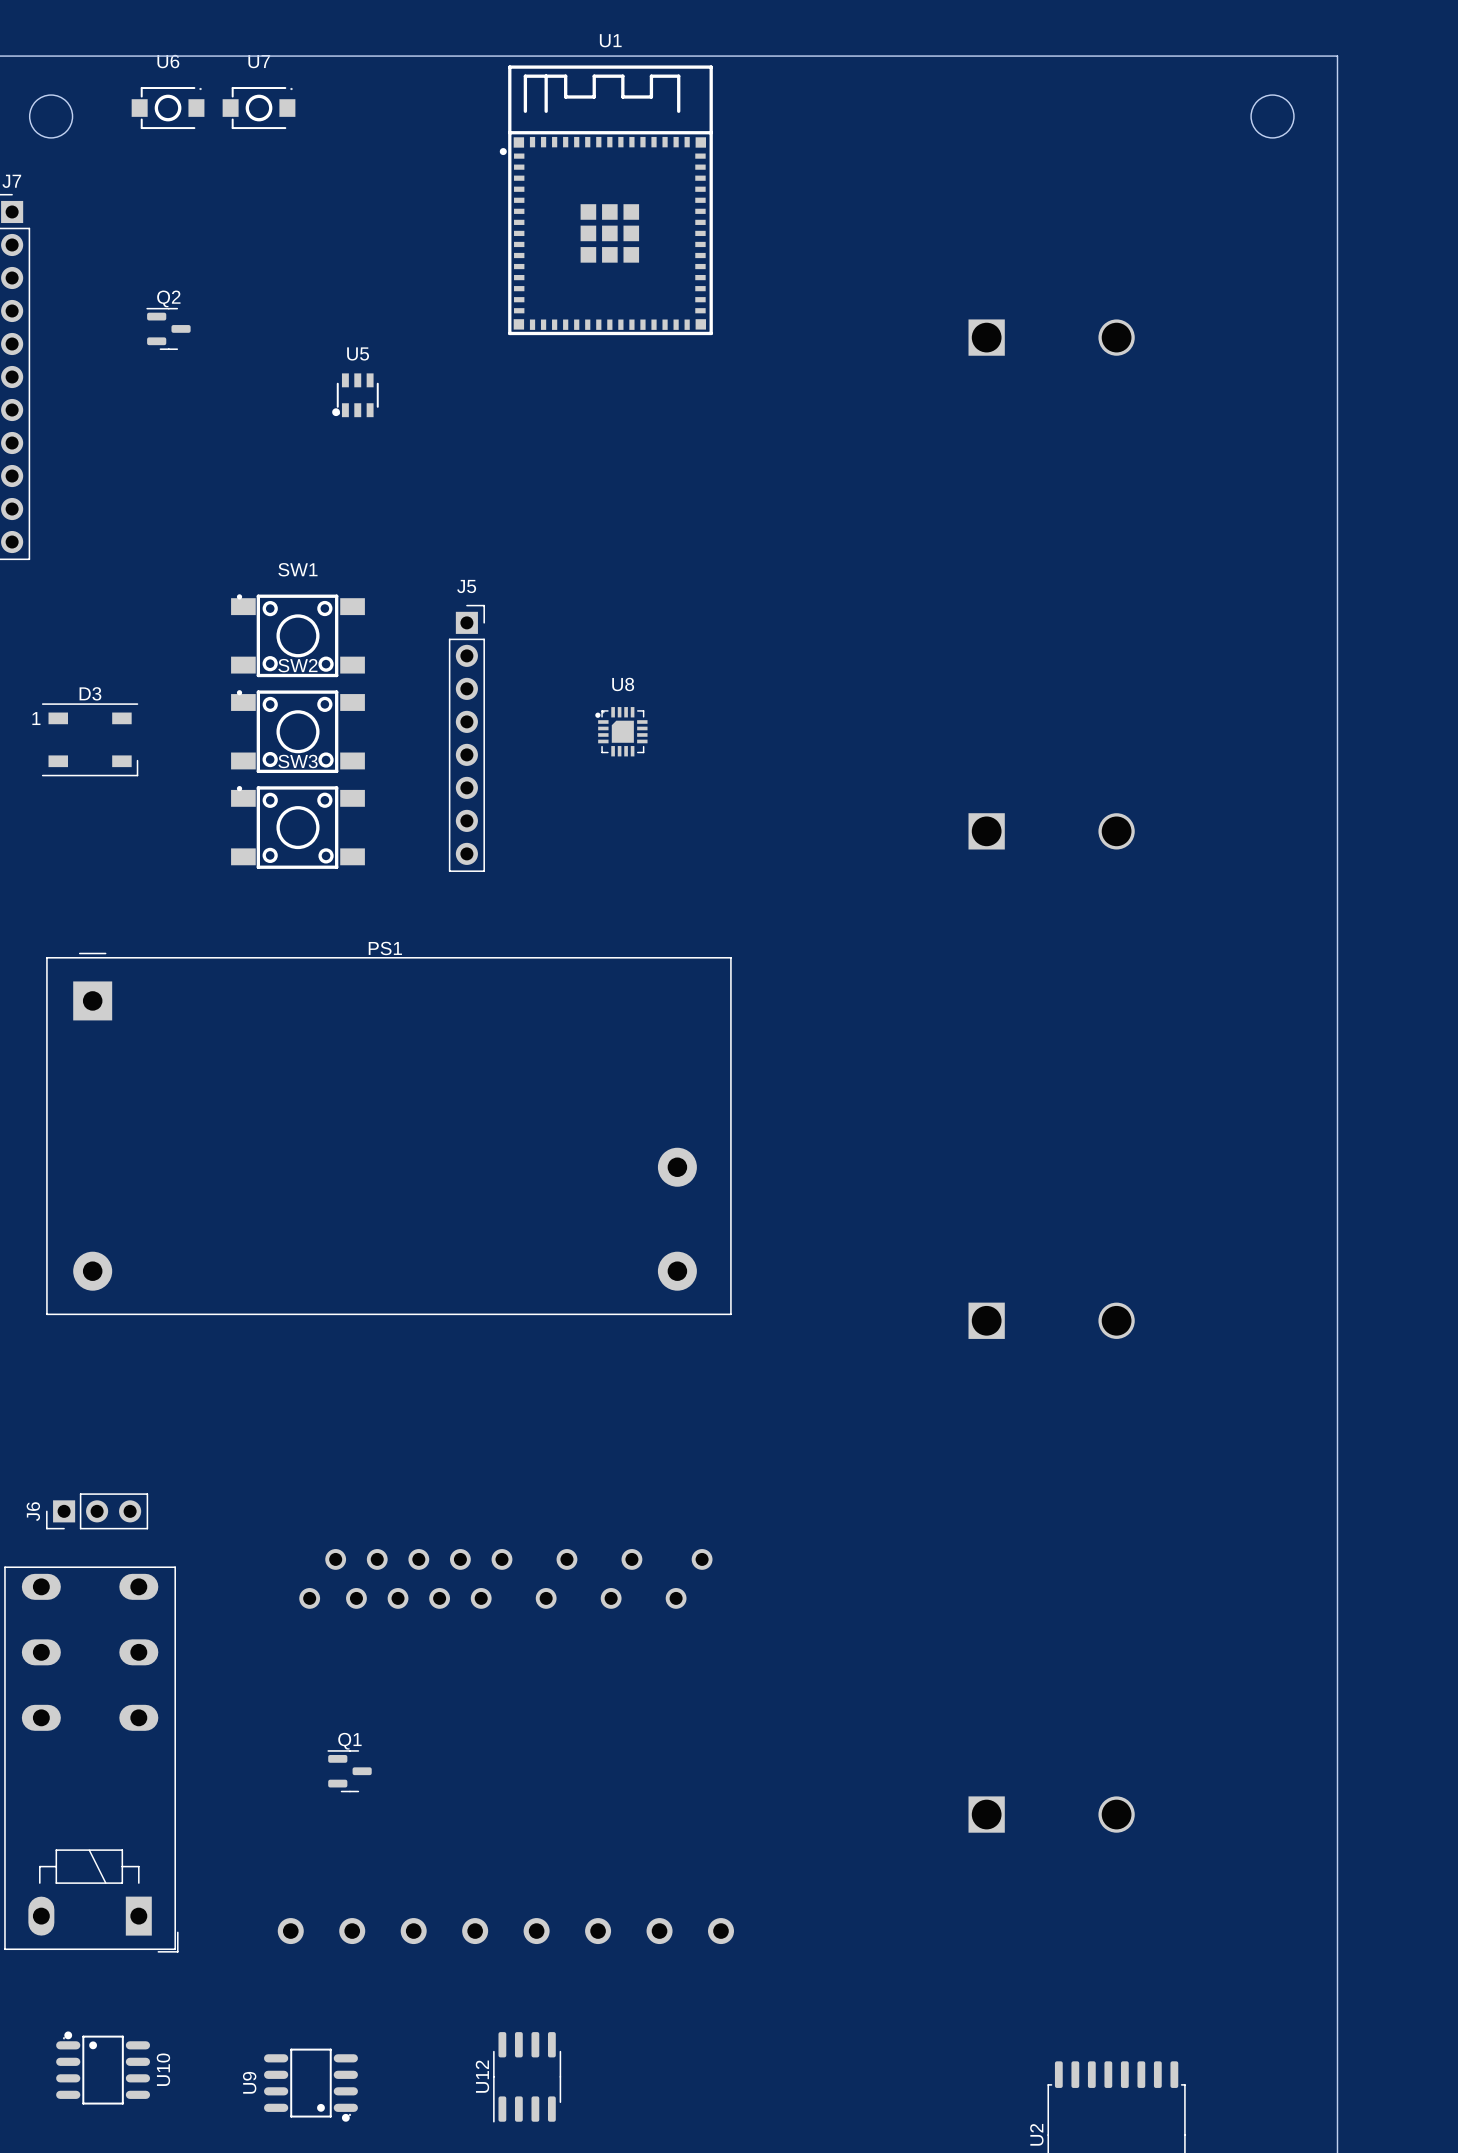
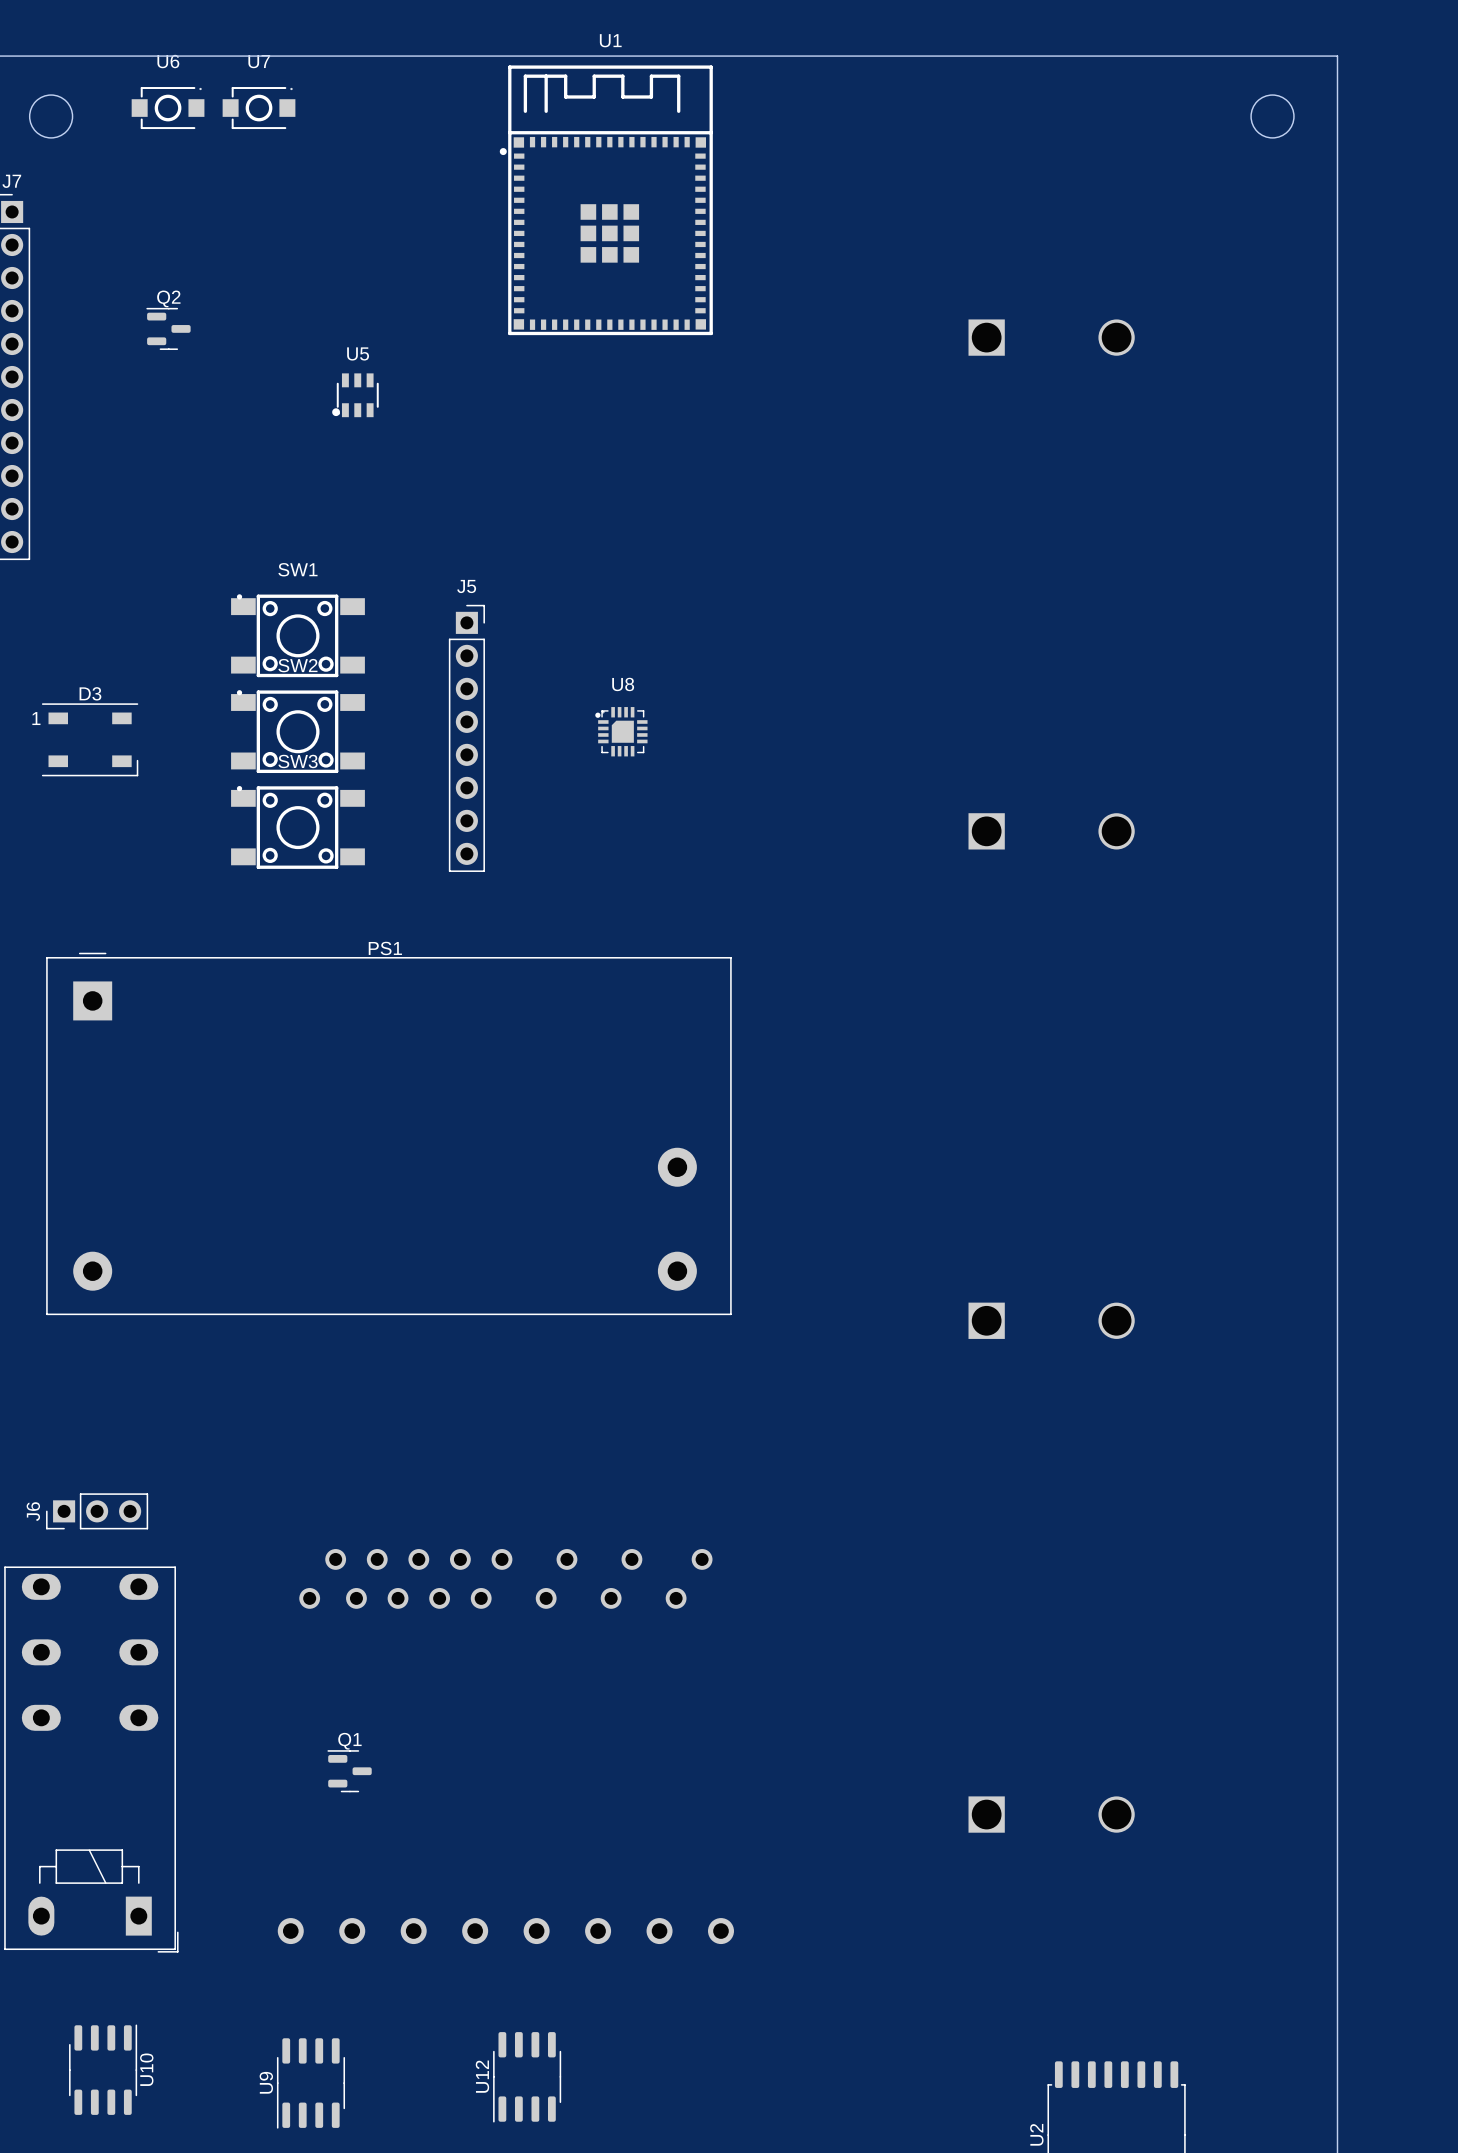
U10 footprint: [56, 2031, 151, 2105] -> [69, 2024, 138, 2115]
U9 footprint: [264, 2048, 358, 2122] -> [276, 2038, 346, 2129]

